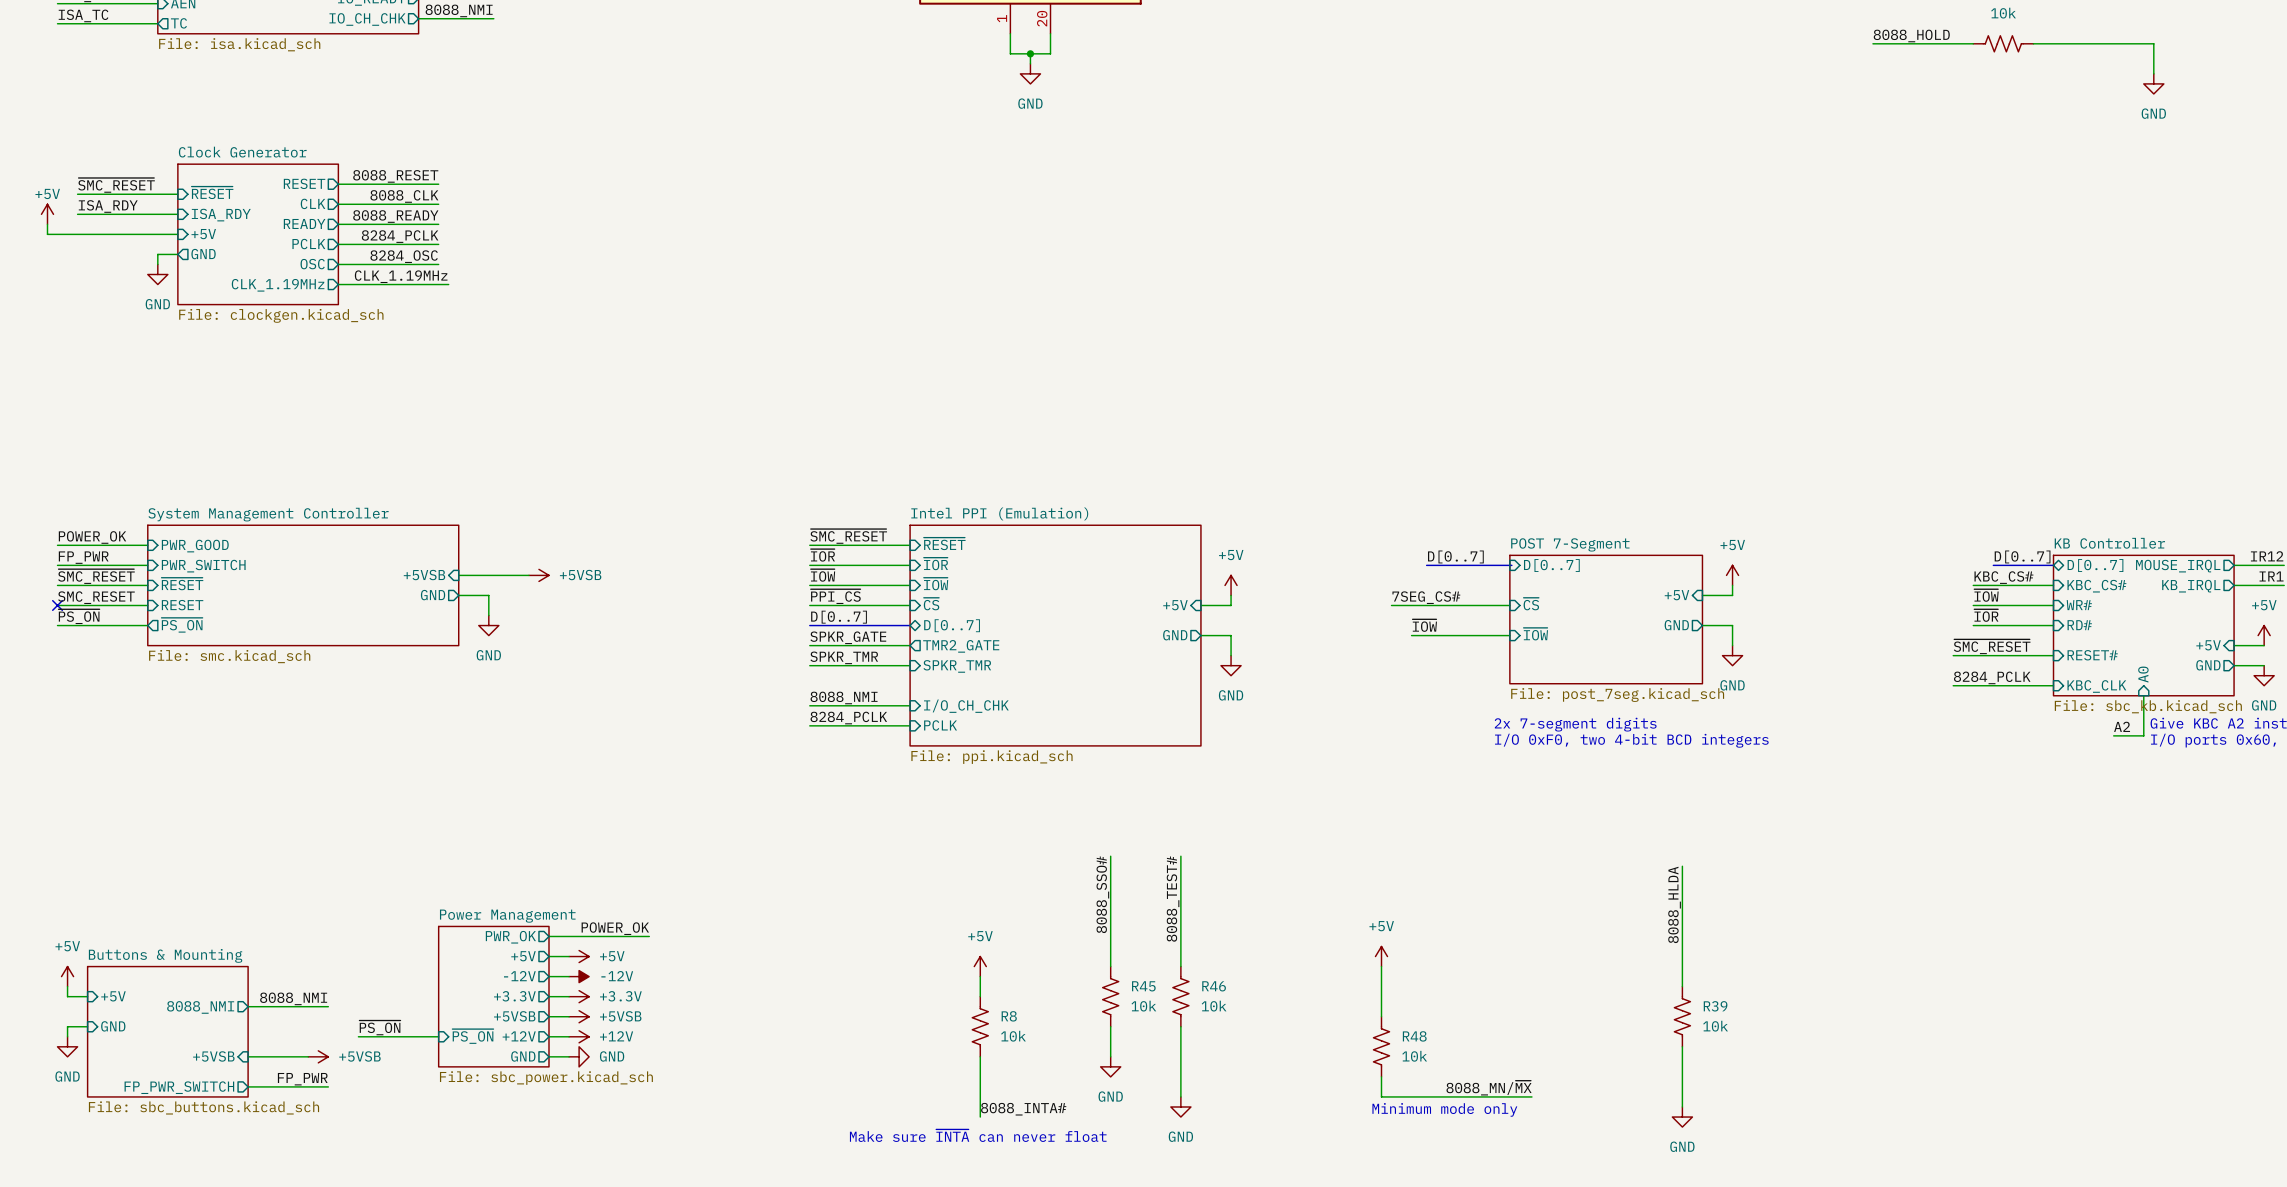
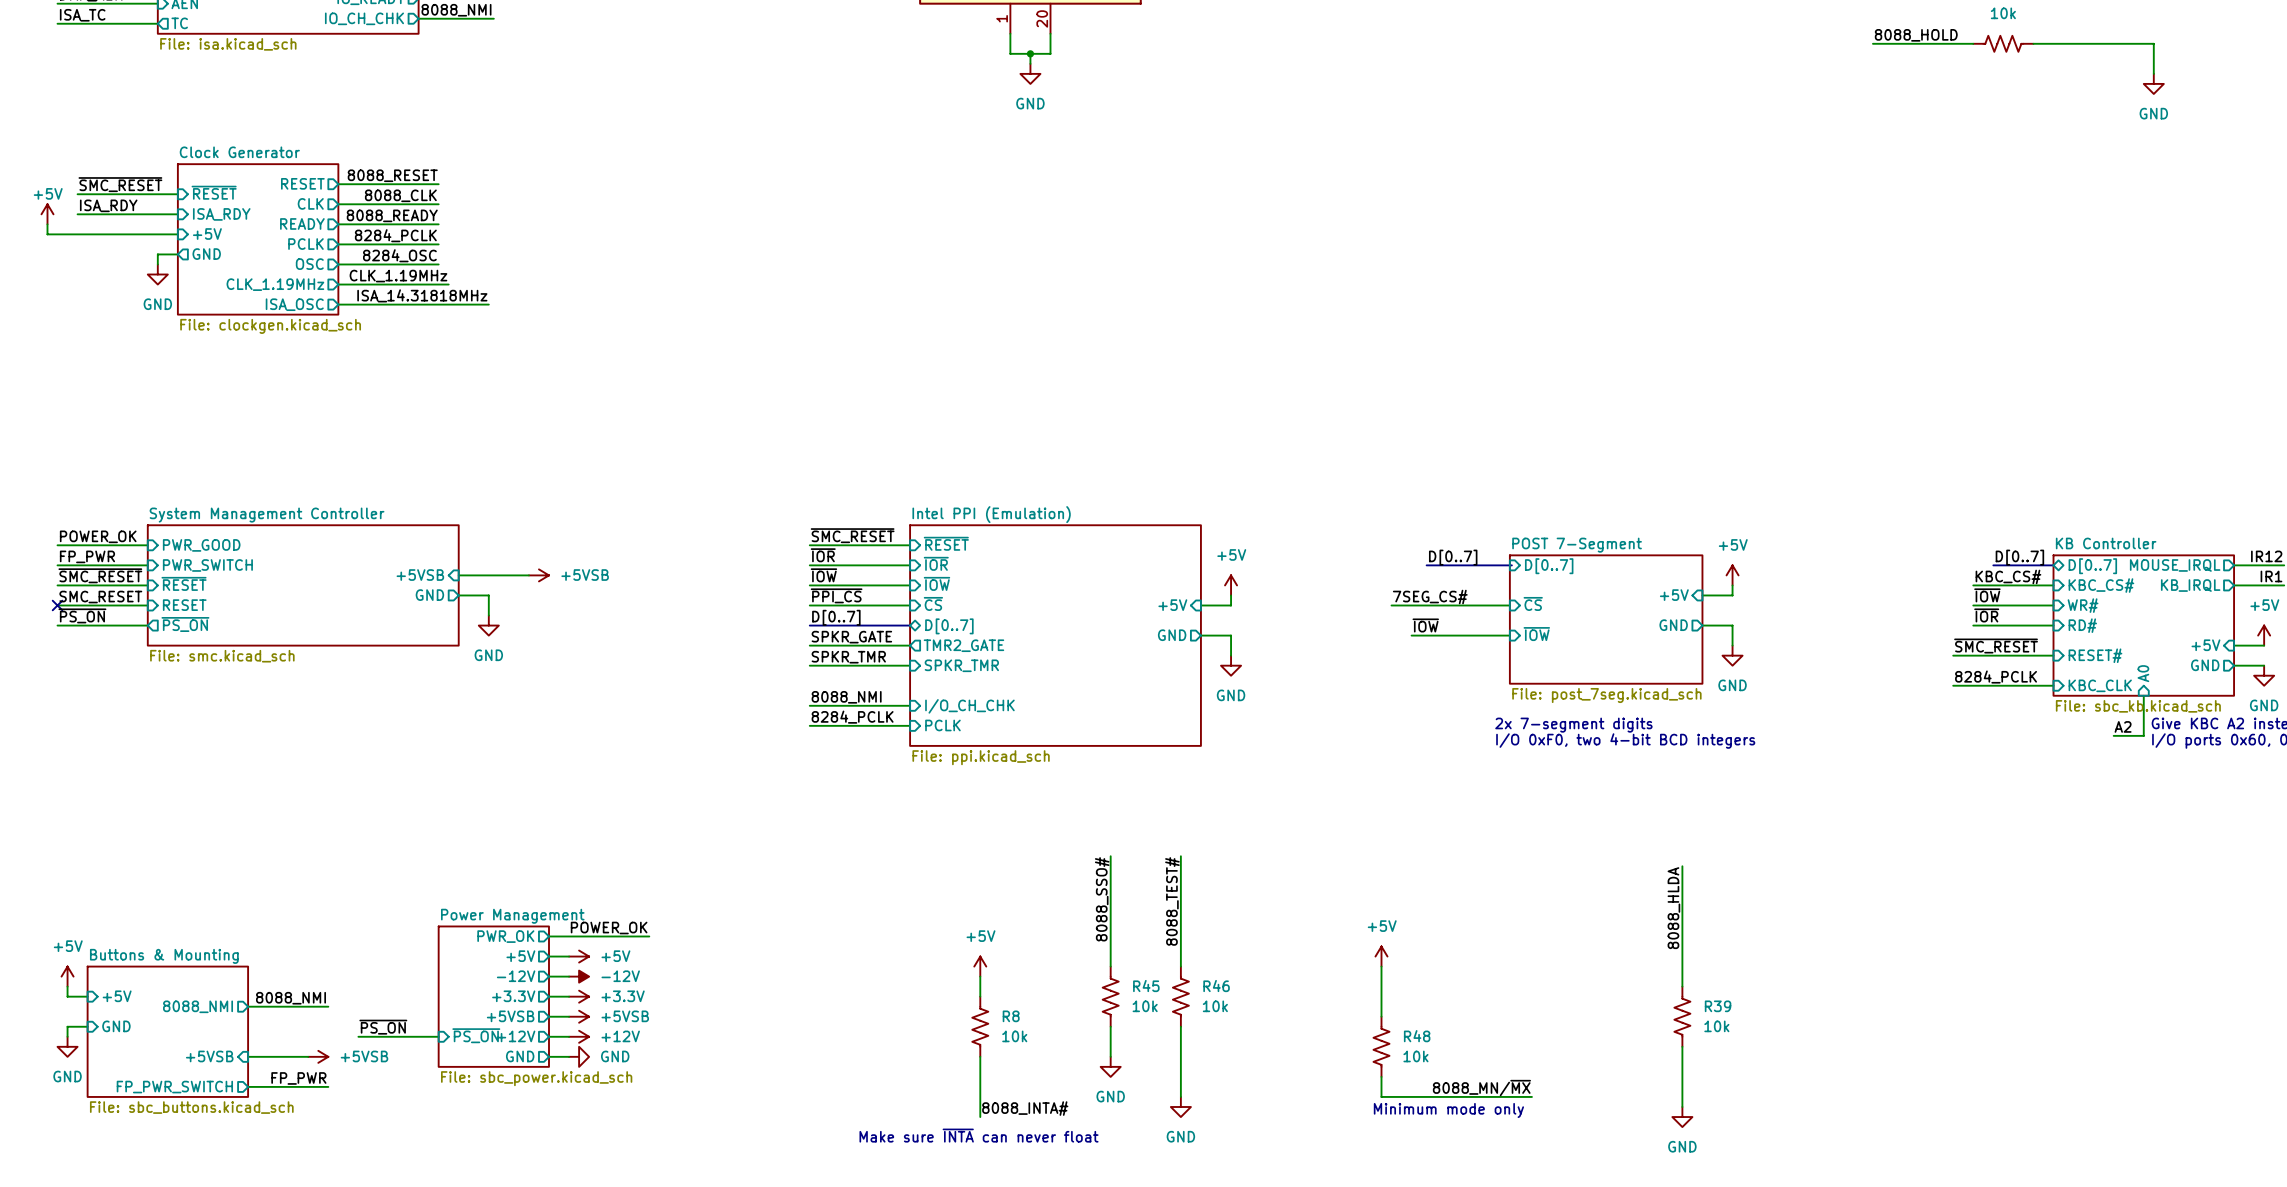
sheet Clock Generator shape: [177, 163, 339, 306] -> [177, 163, 339, 316]
label: none -> ISA_14.31818MHz (422, 295)
wire: none -> (338, 304) (488, 304)
sheet pin: none -> ISA_OSC (294, 304)

